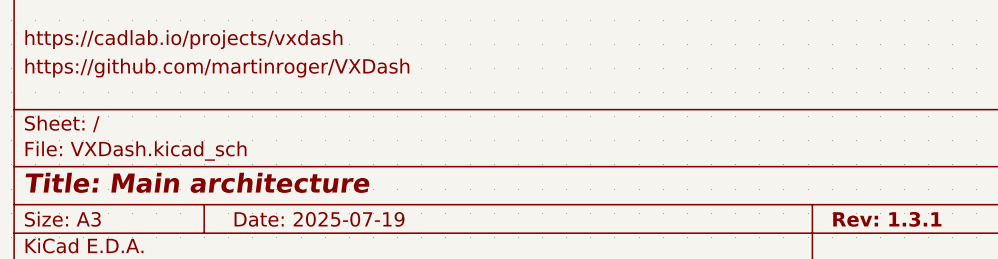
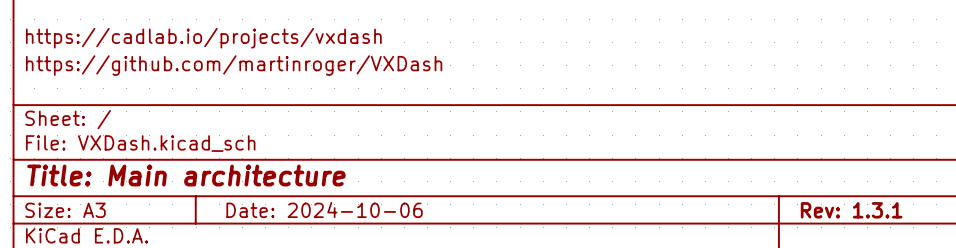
title block: Date: 2025-07-19 (319, 219) -> Date: 2024-10-06 (324, 209)

